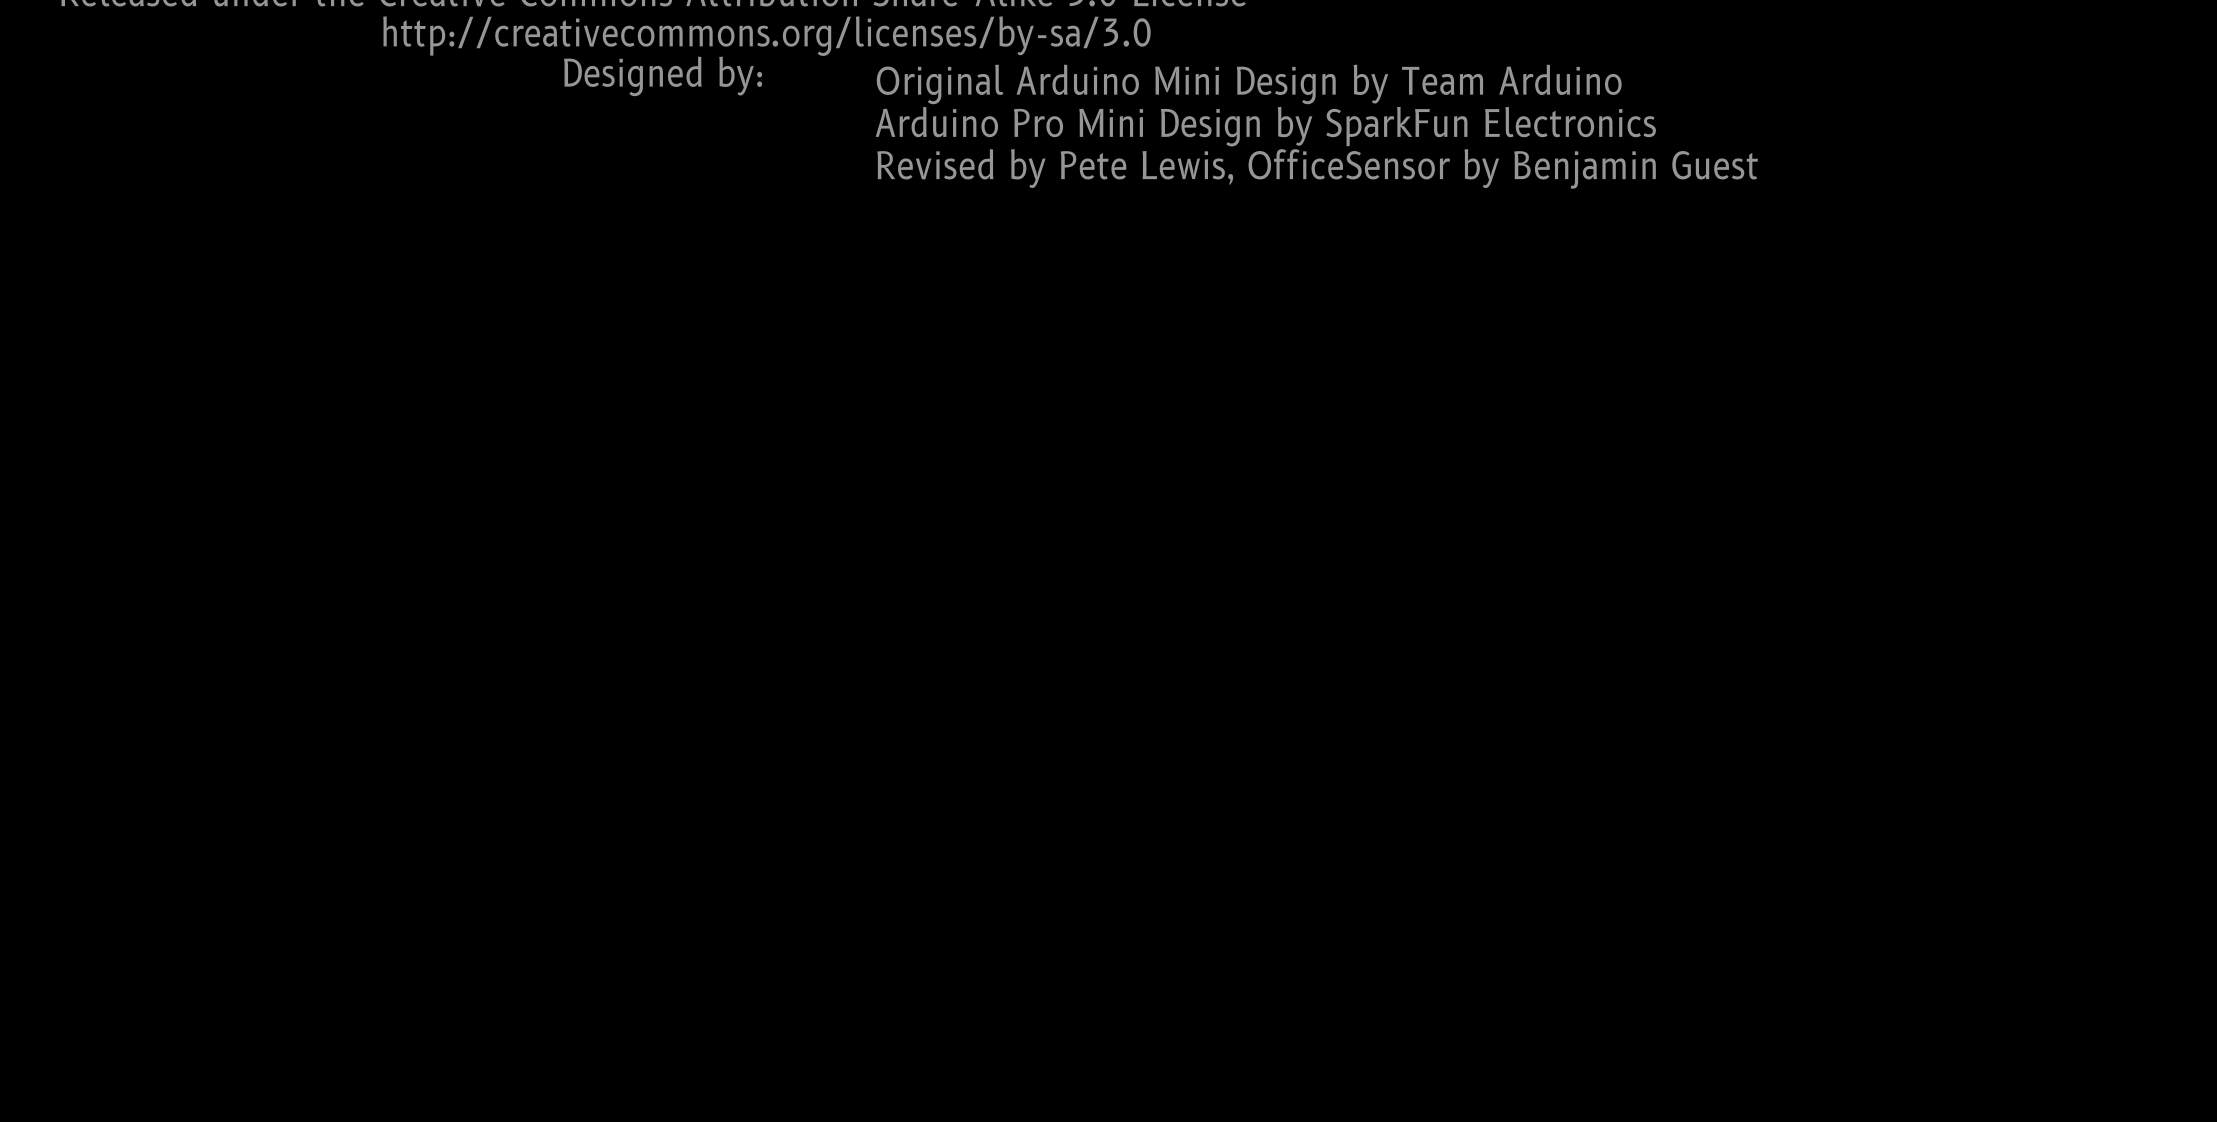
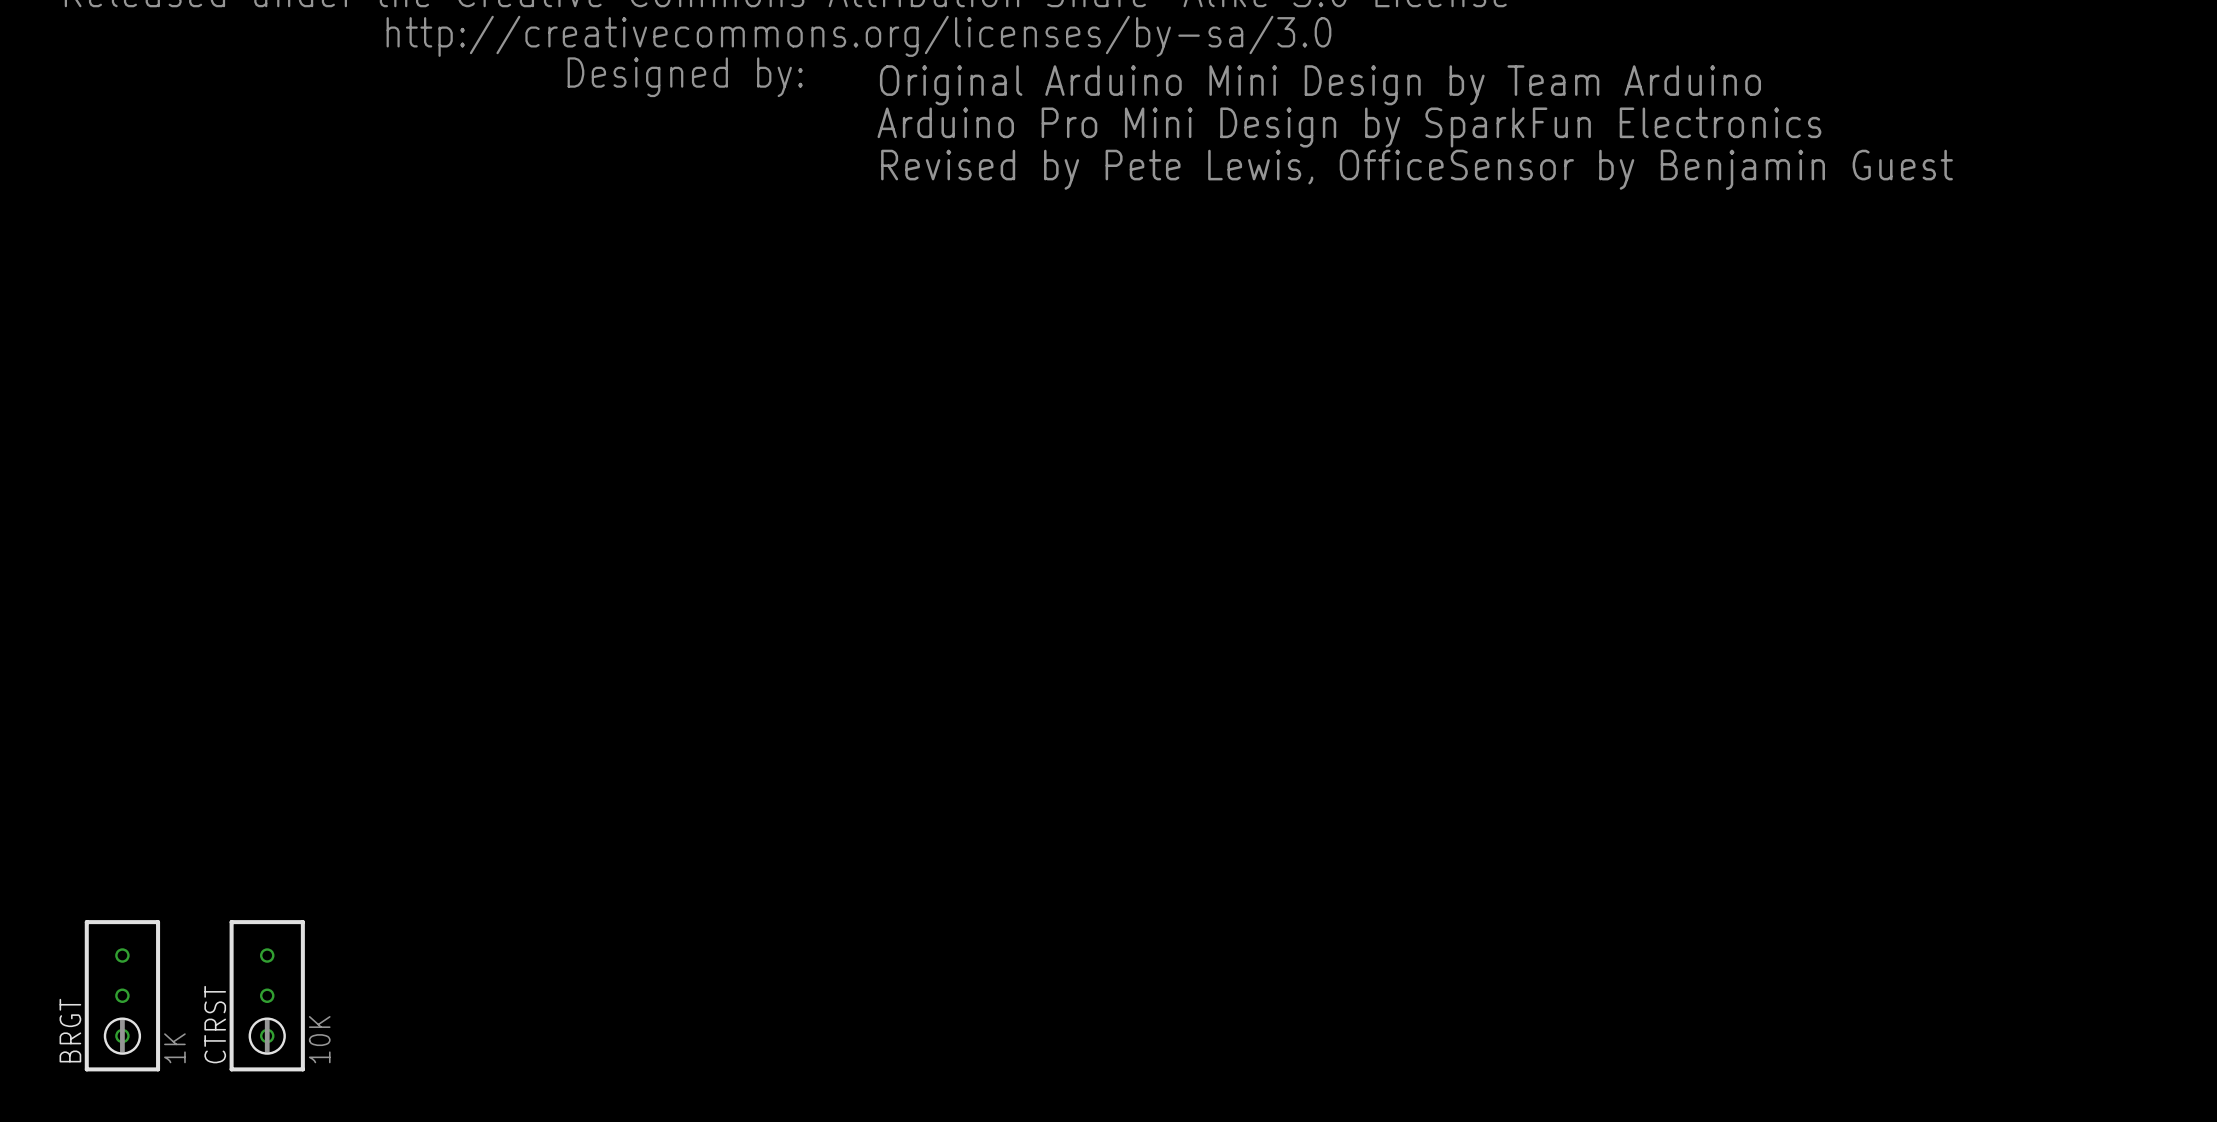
BRGT: none -> 1K (122, 995)
CTRST: none -> 10K (267, 995)

